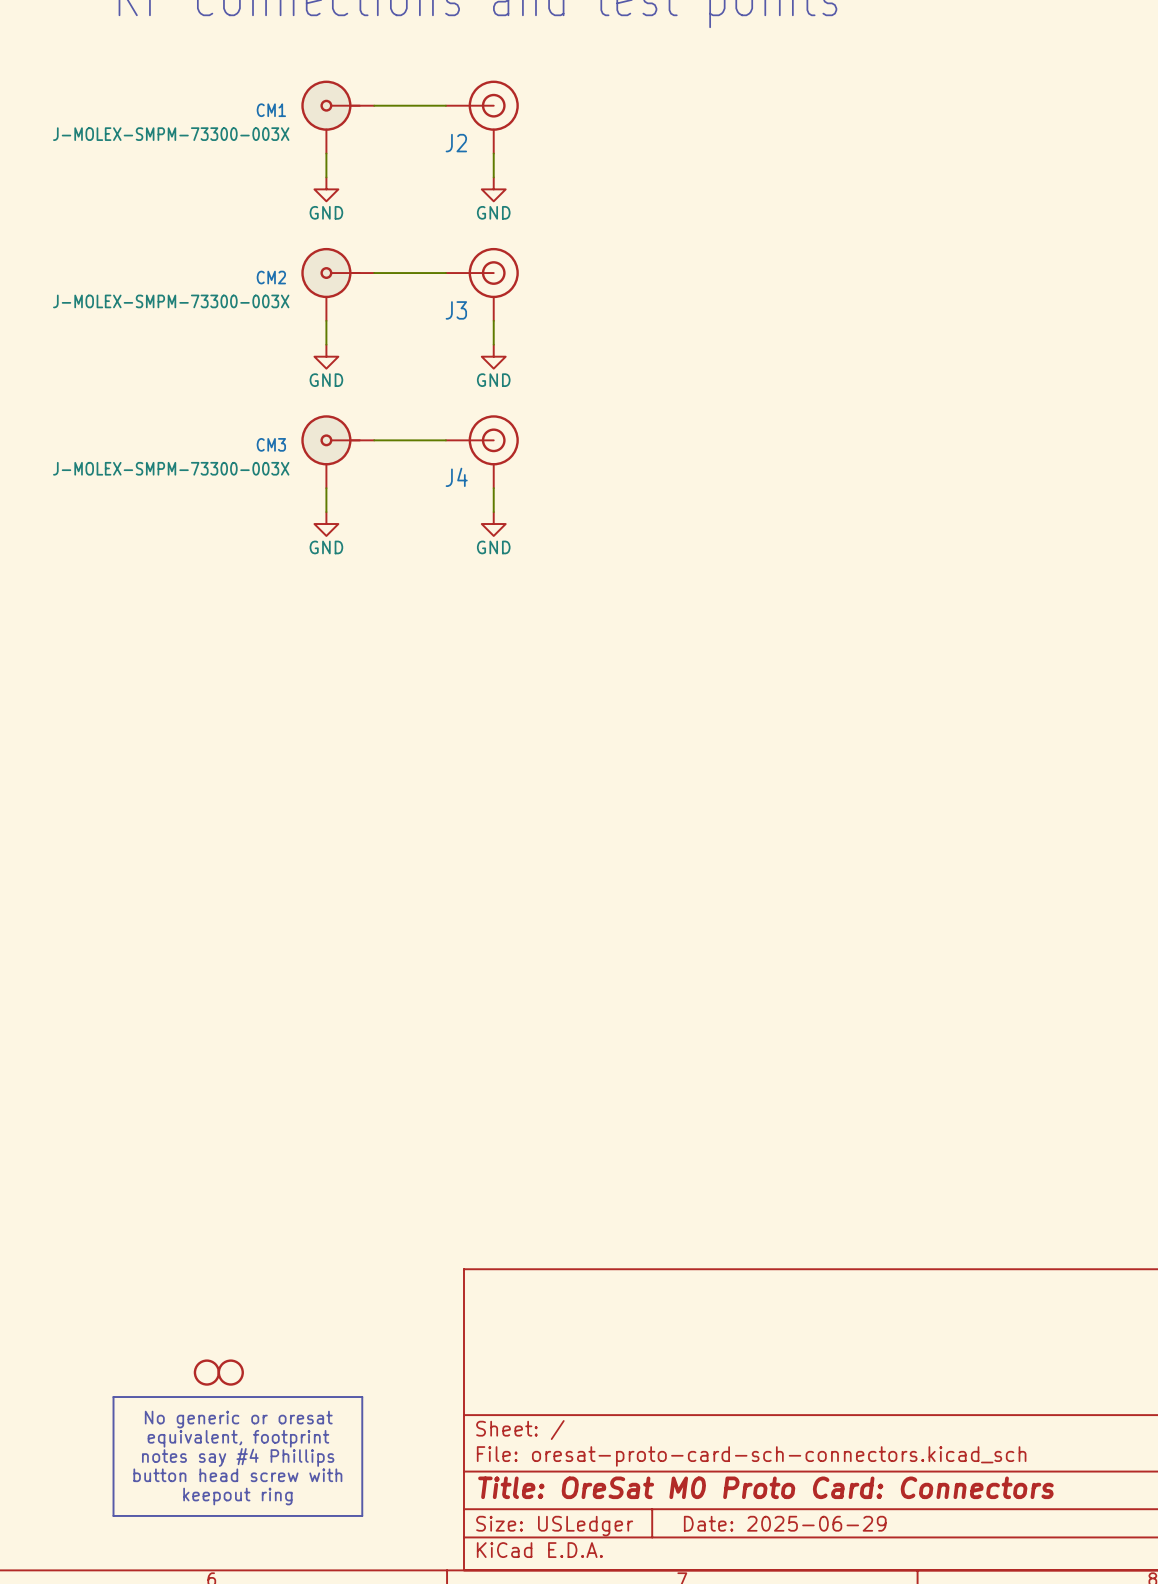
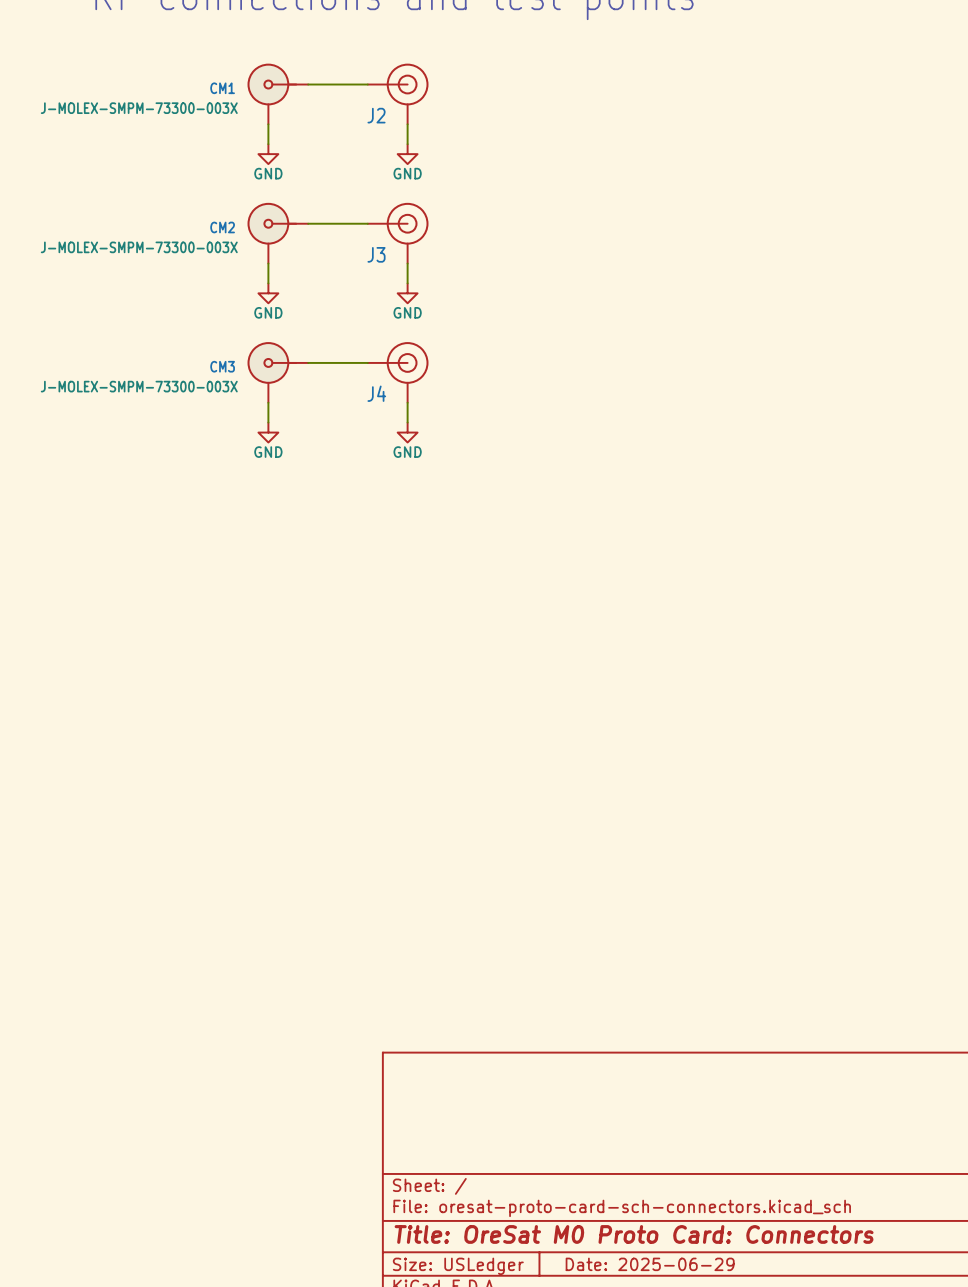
part: (206, 1372) -> none
part: (230, 1372) -> none
line: (113, 1397) (362, 1397) (362, 1515) (113, 1515) (113, 1397) -> none
text: No generic or oresat (238, 1419) -> none
text: equivalent, footprint (238, 1438) -> none
text: notes say #4 Phillips (238, 1457) -> none
text: button head screw with (237, 1475) -> none
text: keepout ring (237, 1496) -> none

